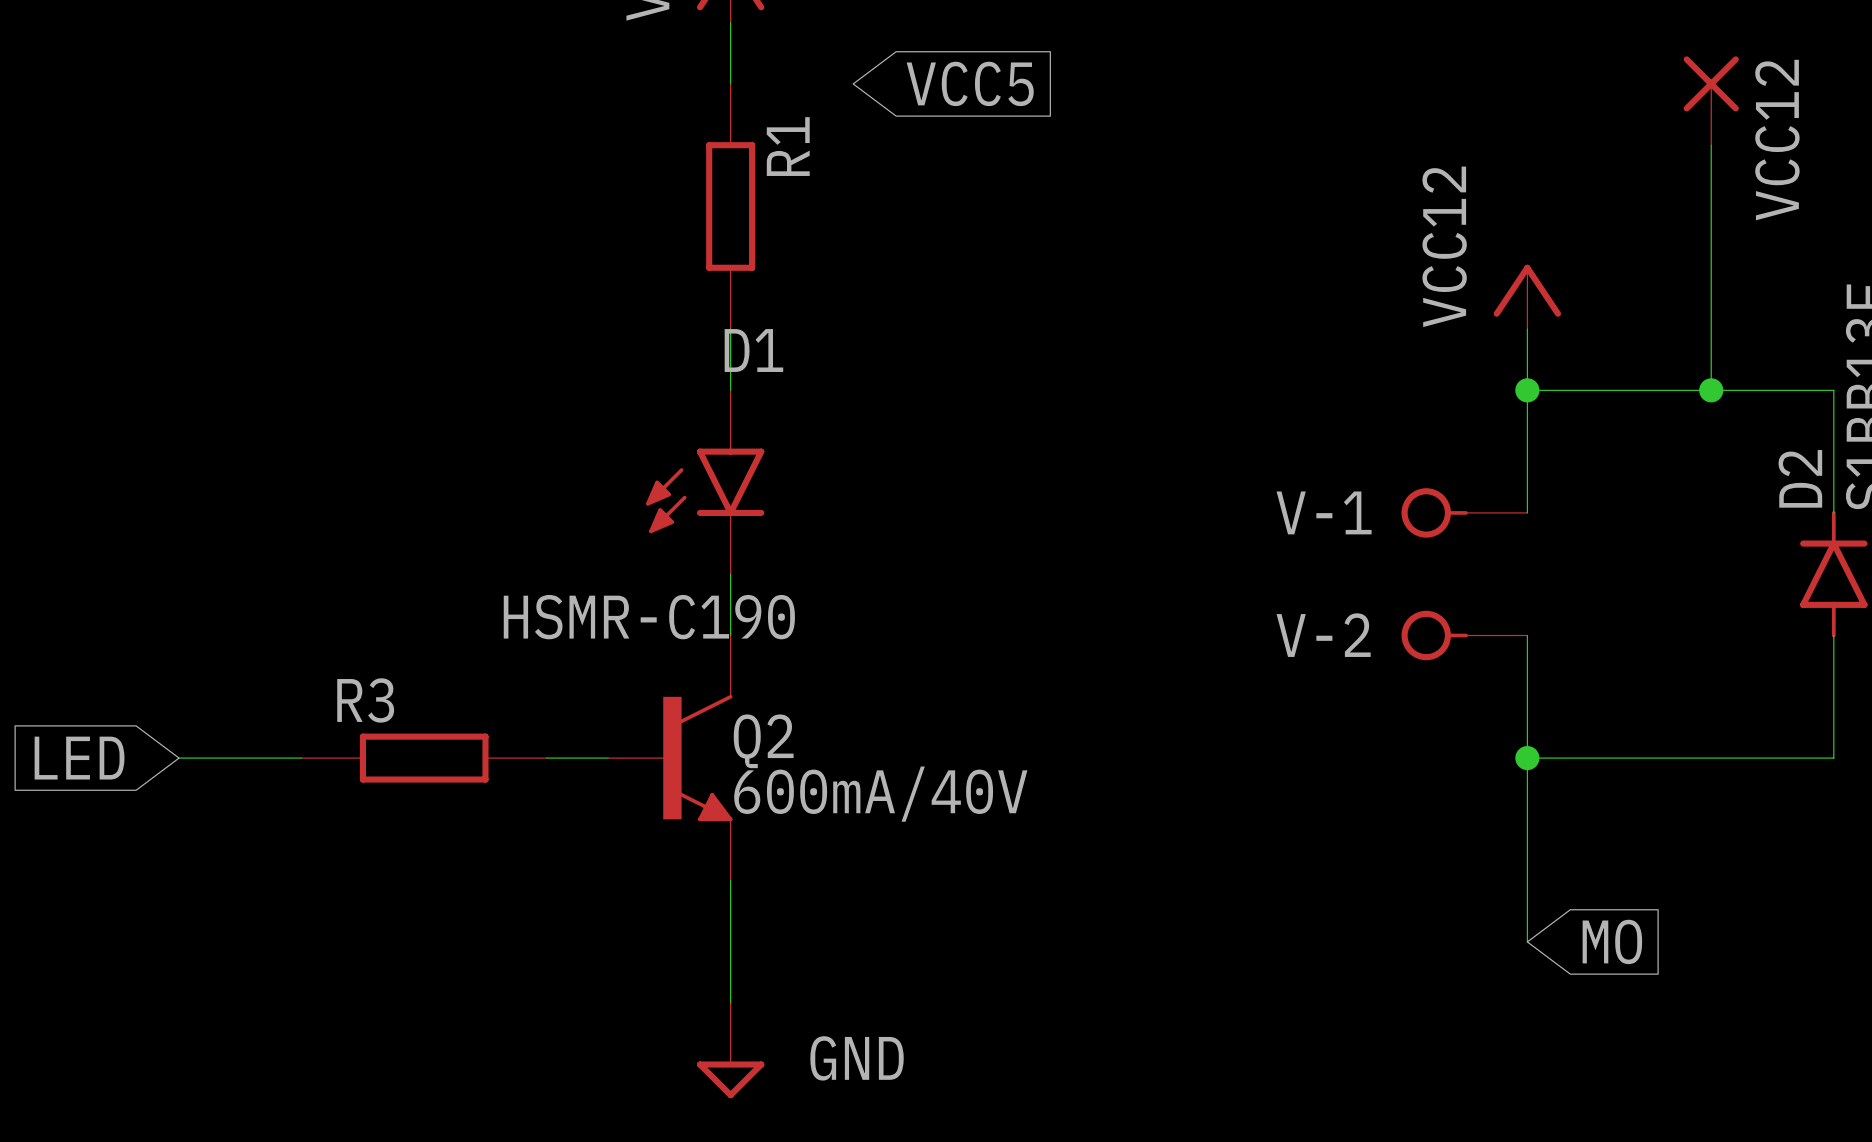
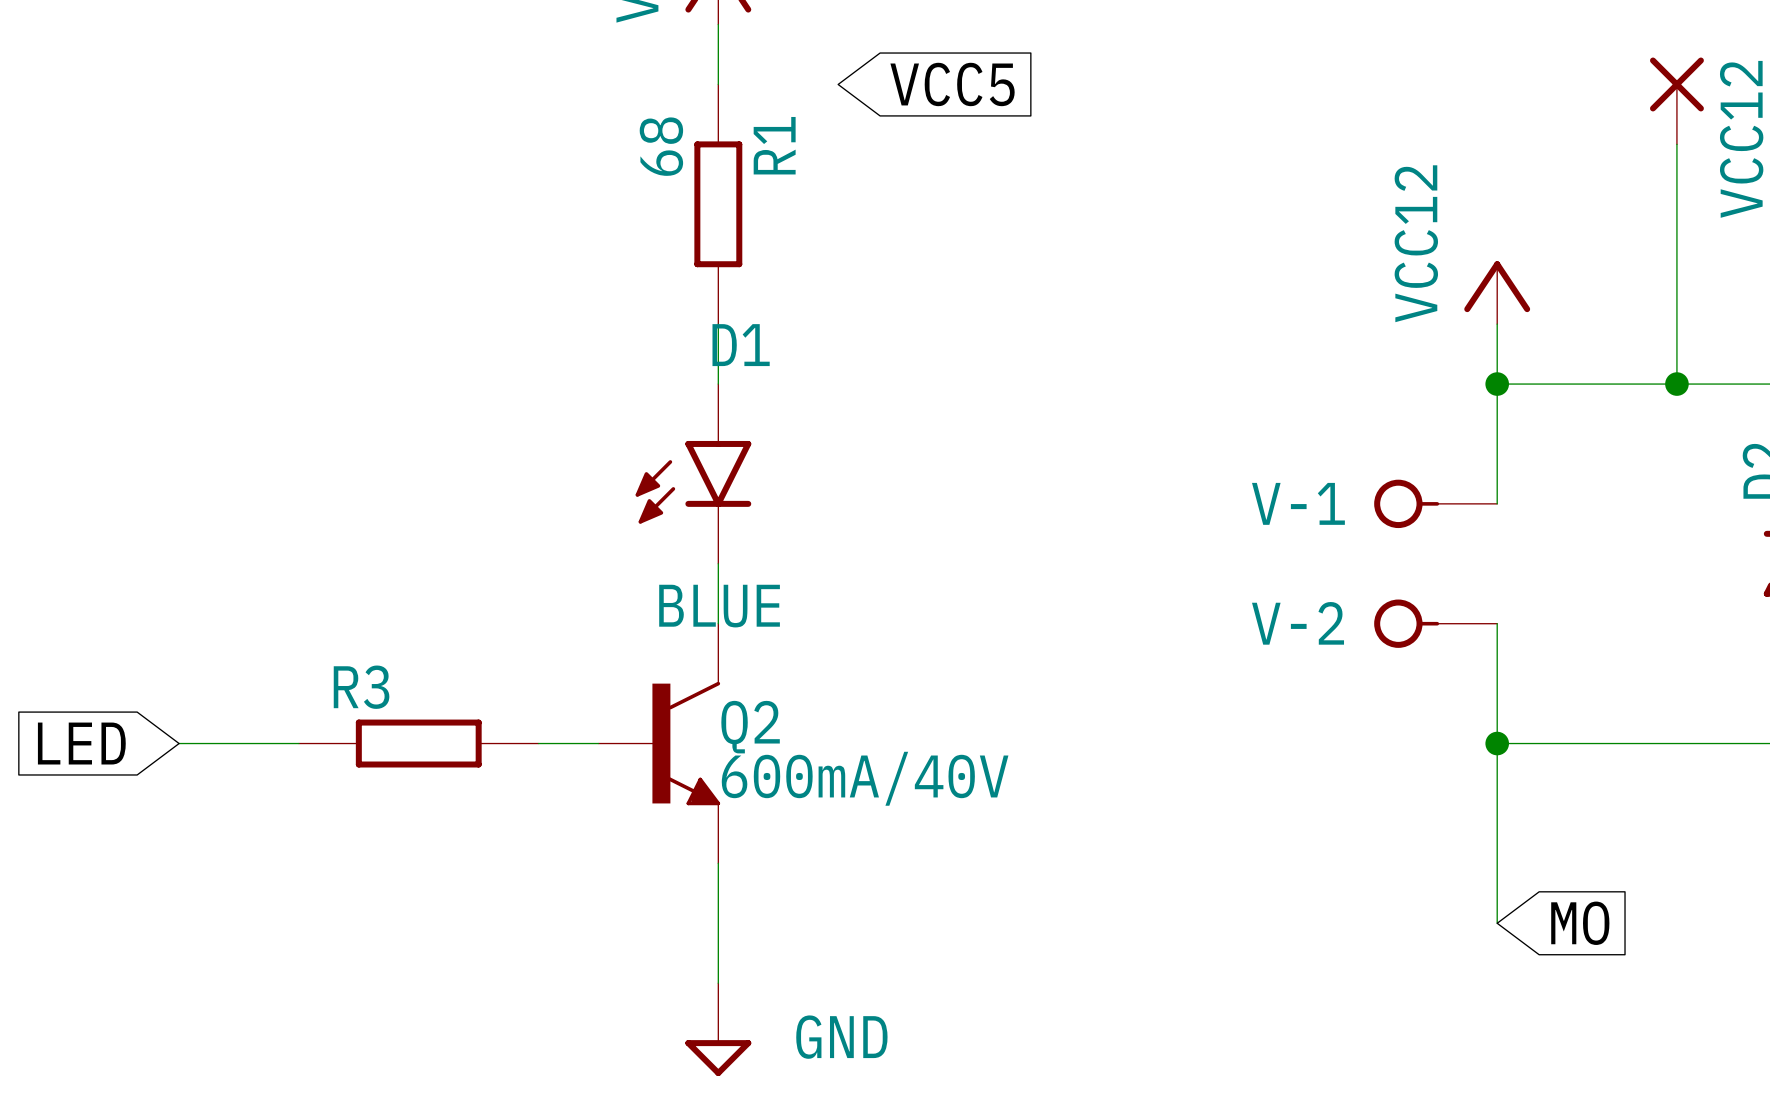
R1 value: none -> 68 (661, 146)
D1 value: HSMR-C190 (649, 617) -> BLUE (719, 606)

